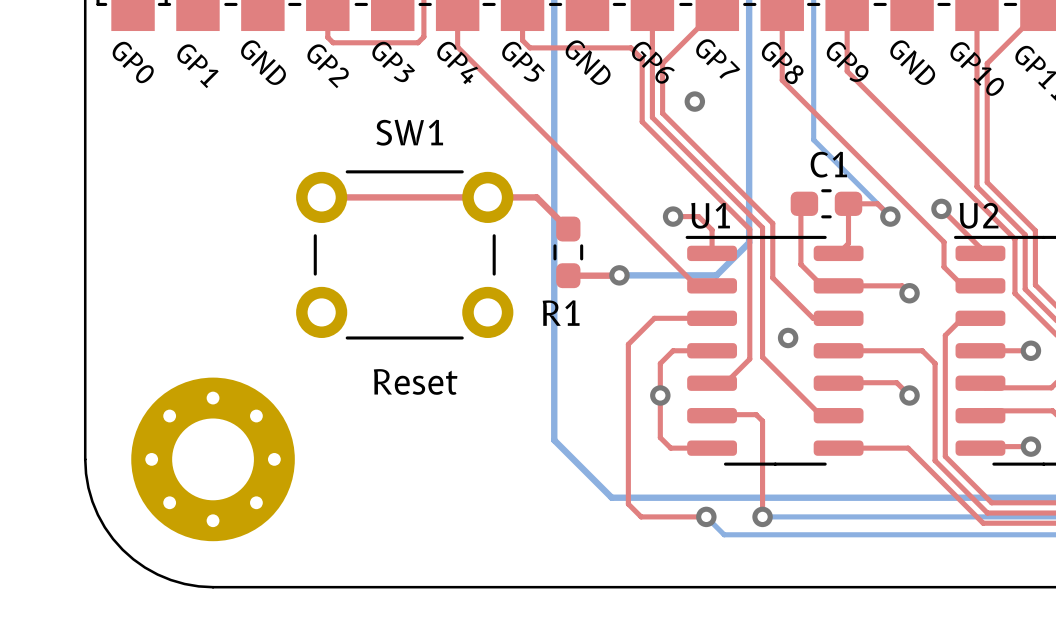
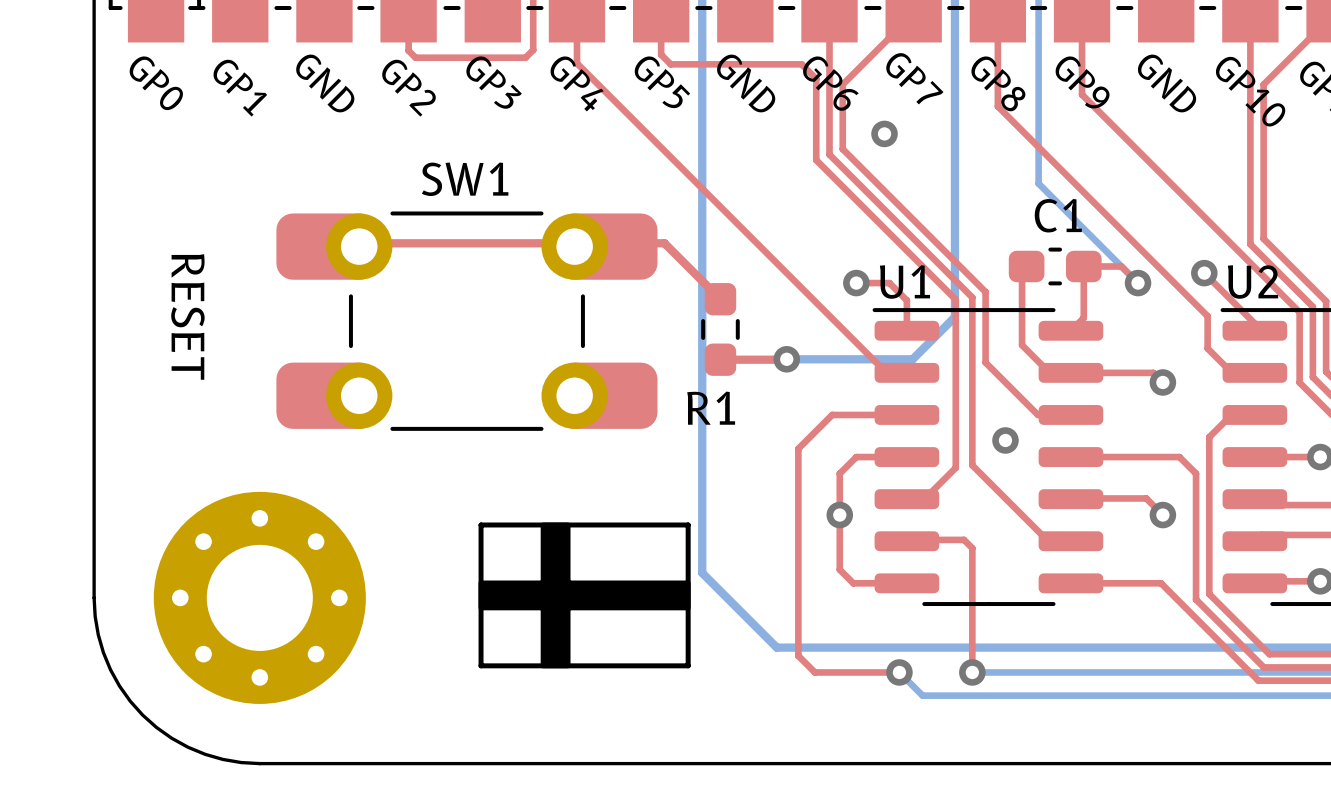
SW1 footprint: [296, 170, 514, 340] -> [276, 211, 658, 431]
top track: (321, 197) (536, 197) -> (345, 243) (664, 243) (679, 258)
text: none -> RESET (187, 316)
text: Reset (415, 381) -> none
drawing: none -> [478, 522, 691, 669]
line: none -> (481, 524) (688, 524) (688, 665) (481, 665) (481, 524)

